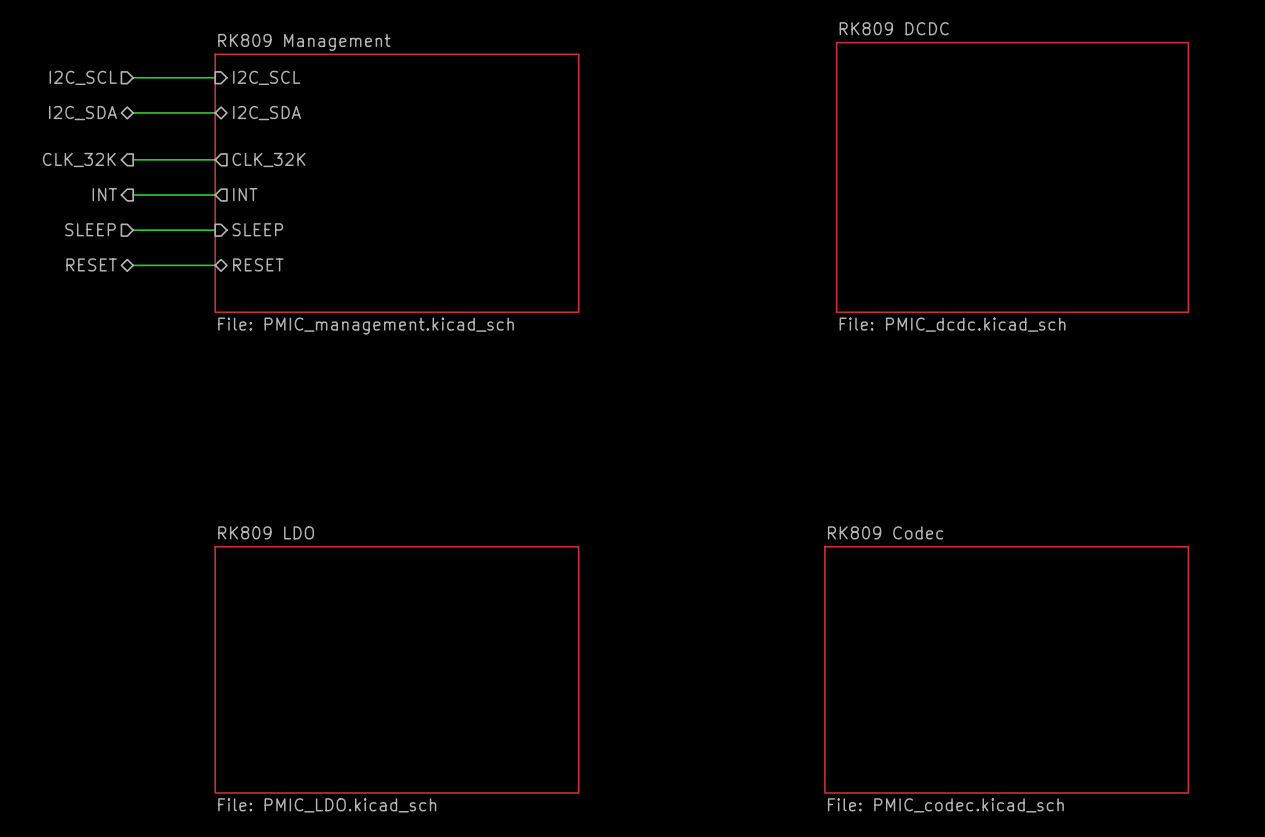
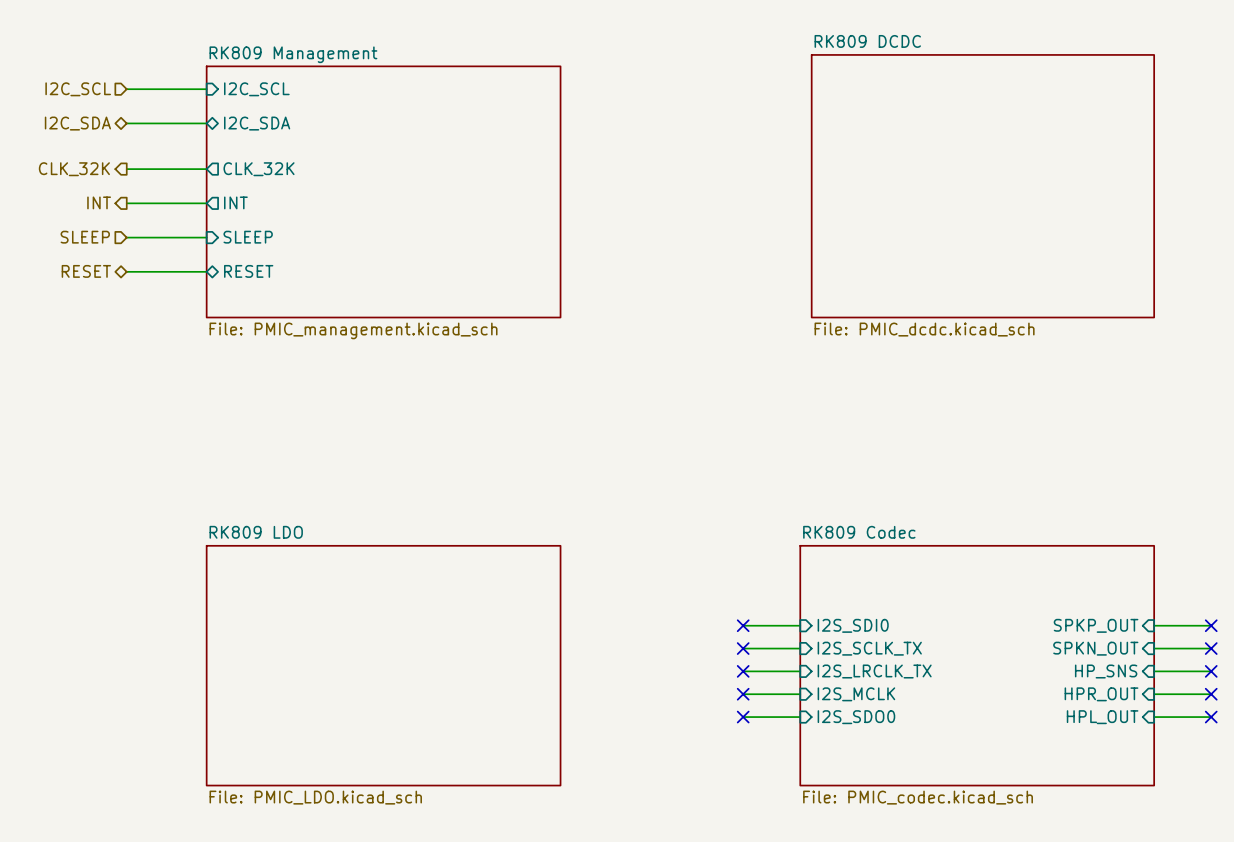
wire: none -> (743, 625) (800, 625)
no-connect mark: none -> (743, 625)
sheet pin: none -> I2S_SDI0 (853, 625)
sheet pin: none -> SPKP_OUT (1096, 625)
wire: none -> (1154, 625) (1211, 625)
no-connect mark: none -> (1211, 625)
wire: none -> (743, 648) (800, 648)
no-connect mark: none -> (743, 648)
sheet pin: none -> I2S_SCLK_TX (869, 648)
sheet pin: none -> SPKN_OUT (1095, 648)
wire: none -> (1154, 648) (1211, 648)
no-connect mark: none -> (1211, 648)
wire: none -> (743, 671) (800, 671)
no-connect mark: none -> (743, 671)
sheet pin: none -> I2S_LRCLK_TX (874, 671)
sheet pin: none -> HP_SNS (1106, 671)
wire: none -> (1154, 671) (1211, 671)
no-connect mark: none -> (1211, 671)
wire: none -> (743, 694) (800, 694)
no-connect mark: none -> (743, 694)
sheet pin: none -> I2S_MCLK (856, 694)
sheet pin: none -> HPR_OUT (1101, 694)
wire: none -> (1154, 694) (1211, 694)
no-connect mark: none -> (1211, 694)
wire: none -> (743, 717) (800, 717)
no-connect mark: none -> (743, 717)
sheet pin: none -> I2S_SDO0 (856, 717)
sheet pin: none -> HPL_OUT (1102, 717)
wire: none -> (1154, 717) (1211, 717)
no-connect mark: none -> (1211, 717)

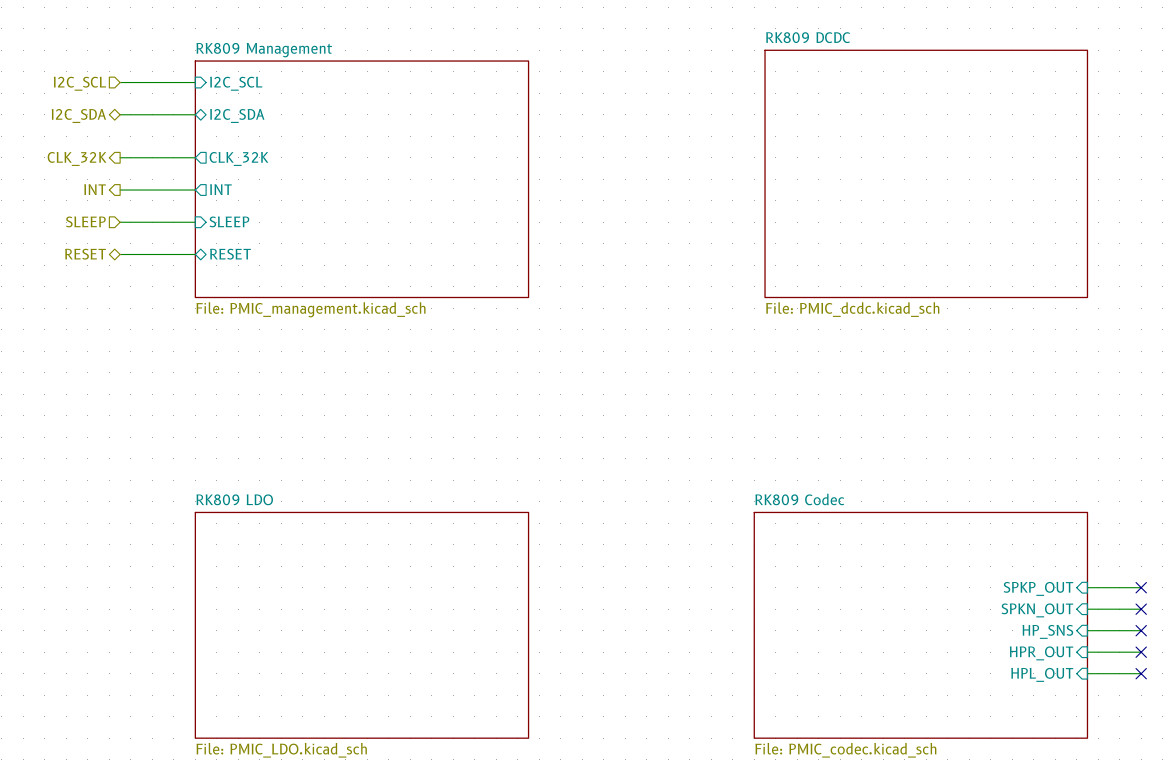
wire: (743, 625) (800, 625) -> none
no-connect mark: (743, 625) -> none
sheet pin: I2S_SDI0 (853, 625) -> none
wire: (743, 648) (800, 648) -> none
no-connect mark: (743, 648) -> none
sheet pin: I2S_SCLK_TX (869, 648) -> none
wire: (743, 671) (800, 671) -> none
no-connect mark: (743, 671) -> none
sheet pin: I2S_LRCLK_TX (874, 671) -> none
wire: (743, 694) (800, 694) -> none
no-connect mark: (743, 694) -> none
sheet pin: I2S_MCLK (856, 694) -> none
wire: (743, 717) (800, 717) -> none
no-connect mark: (743, 717) -> none
sheet pin: I2S_SDO0 (856, 717) -> none

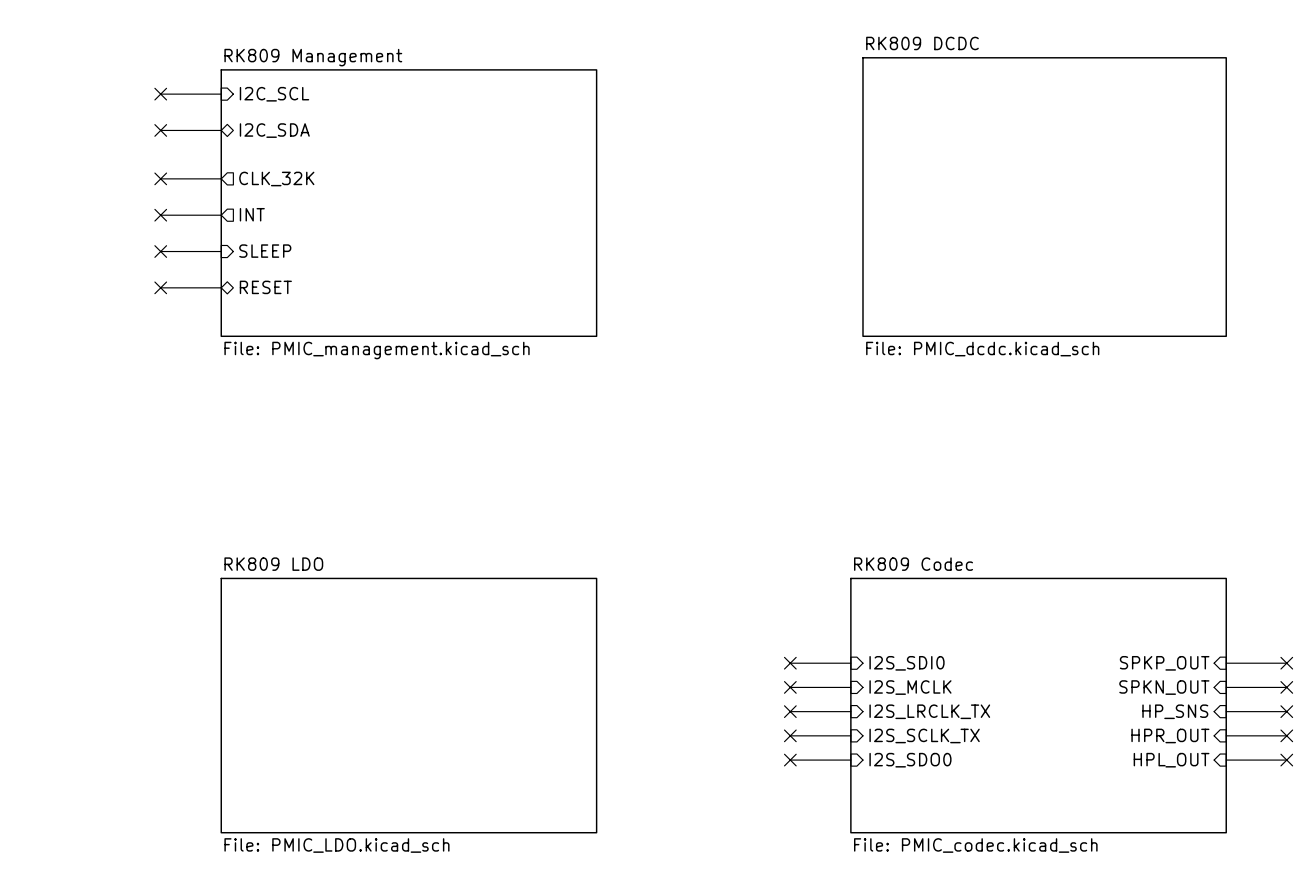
wire: (120, 82) (141, 82) -> none
no-connect mark: none -> (160, 94)
hierarchical label: I2C_SCL (79, 83) -> none
wire: (120, 114) (141, 114) -> none
no-connect mark: none -> (160, 130)
hierarchical label: I2C_SDA (78, 115) -> none
wire: (120, 157) (141, 157) -> none
no-connect mark: none -> (160, 178)
hierarchical label: CLK_32K (77, 158) -> none
hierarchical label: INT (95, 189) -> none
wire: (120, 190) (141, 190) -> none
no-connect mark: none -> (160, 215)
hierarchical label: SLEEP (85, 221) -> none
wire: (120, 222) (141, 222) -> none
no-connect mark: none -> (160, 251)
hierarchical label: RESET (85, 254) -> none
wire: (120, 254) (141, 254) -> none
no-connect mark: none -> (160, 287)
wire: none -> (790, 663) (850, 663)
no-connect mark: none -> (790, 663)
sheet pin: none -> I2S_SDI0 (907, 663)
wire: none -> (790, 687) (850, 687)
no-connect mark: none -> (790, 687)
sheet pin: none -> I2S_MCLK (910, 687)
wire: none -> (790, 711) (850, 711)
no-connect mark: none -> (790, 711)
sheet pin: none -> I2S_LRCLK_TX (929, 711)
wire: none -> (790, 735) (850, 735)
no-connect mark: none -> (790, 735)
sheet pin: none -> I2S_SCLK_TX (924, 735)
wire: none -> (790, 760) (850, 760)
no-connect mark: none -> (790, 760)
sheet pin: none -> I2S_SDO0 (910, 760)

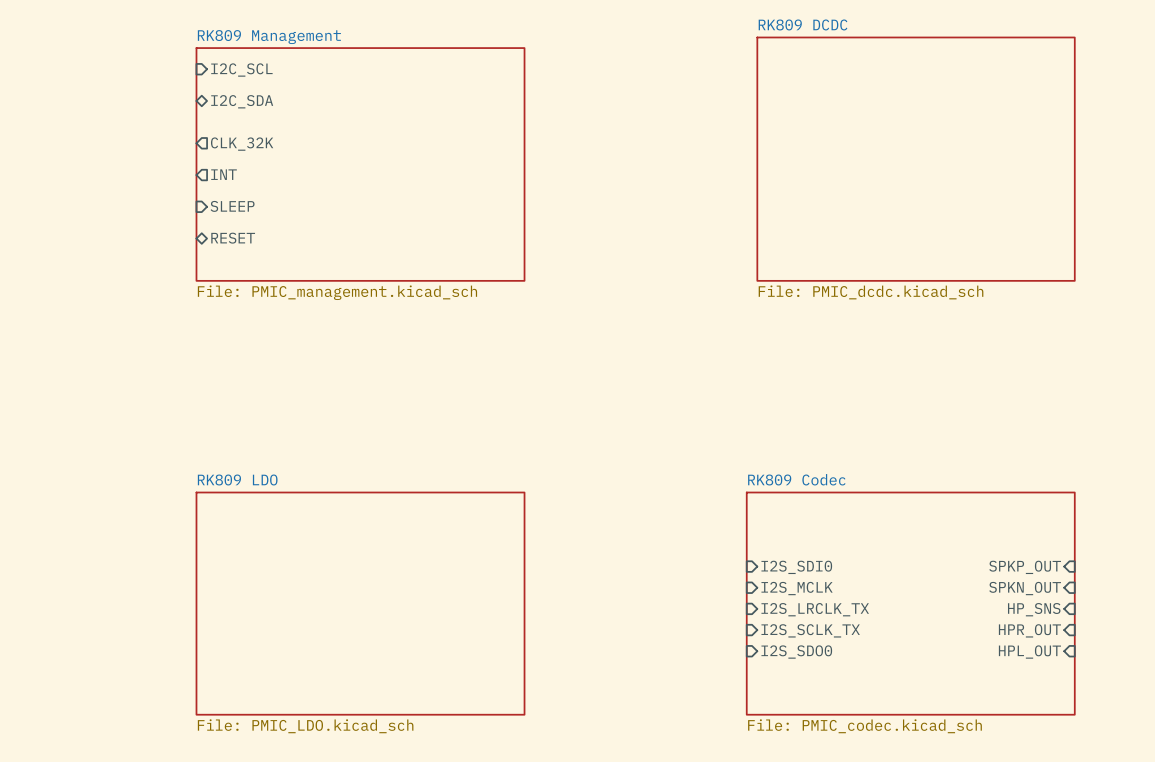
wire: (160, 94) (221, 94) -> none
no-connect mark: (160, 94) -> none
wire: (160, 130) (221, 130) -> none
no-connect mark: (160, 130) -> none
wire: (160, 178) (221, 178) -> none
no-connect mark: (160, 178) -> none
wire: (160, 215) (221, 215) -> none
no-connect mark: (160, 215) -> none
wire: (160, 251) (221, 251) -> none
no-connect mark: (160, 251) -> none
wire: (160, 287) (221, 287) -> none
no-connect mark: (160, 287) -> none
wire: (790, 663) (850, 663) -> none
no-connect mark: (790, 663) -> none
wire: (1226, 663) (1286, 663) -> none
no-connect mark: (1286, 663) -> none
wire: (790, 687) (850, 687) -> none
no-connect mark: (790, 687) -> none
wire: (1226, 687) (1286, 687) -> none
no-connect mark: (1286, 687) -> none
wire: (790, 711) (850, 711) -> none
no-connect mark: (790, 711) -> none
wire: (1226, 711) (1286, 711) -> none
no-connect mark: (1286, 711) -> none
wire: (790, 735) (850, 735) -> none
no-connect mark: (790, 735) -> none
wire: (1226, 735) (1286, 735) -> none
no-connect mark: (1286, 735) -> none
wire: (790, 760) (850, 760) -> none
no-connect mark: (790, 760) -> none
wire: (1226, 760) (1286, 760) -> none
no-connect mark: (1286, 760) -> none

